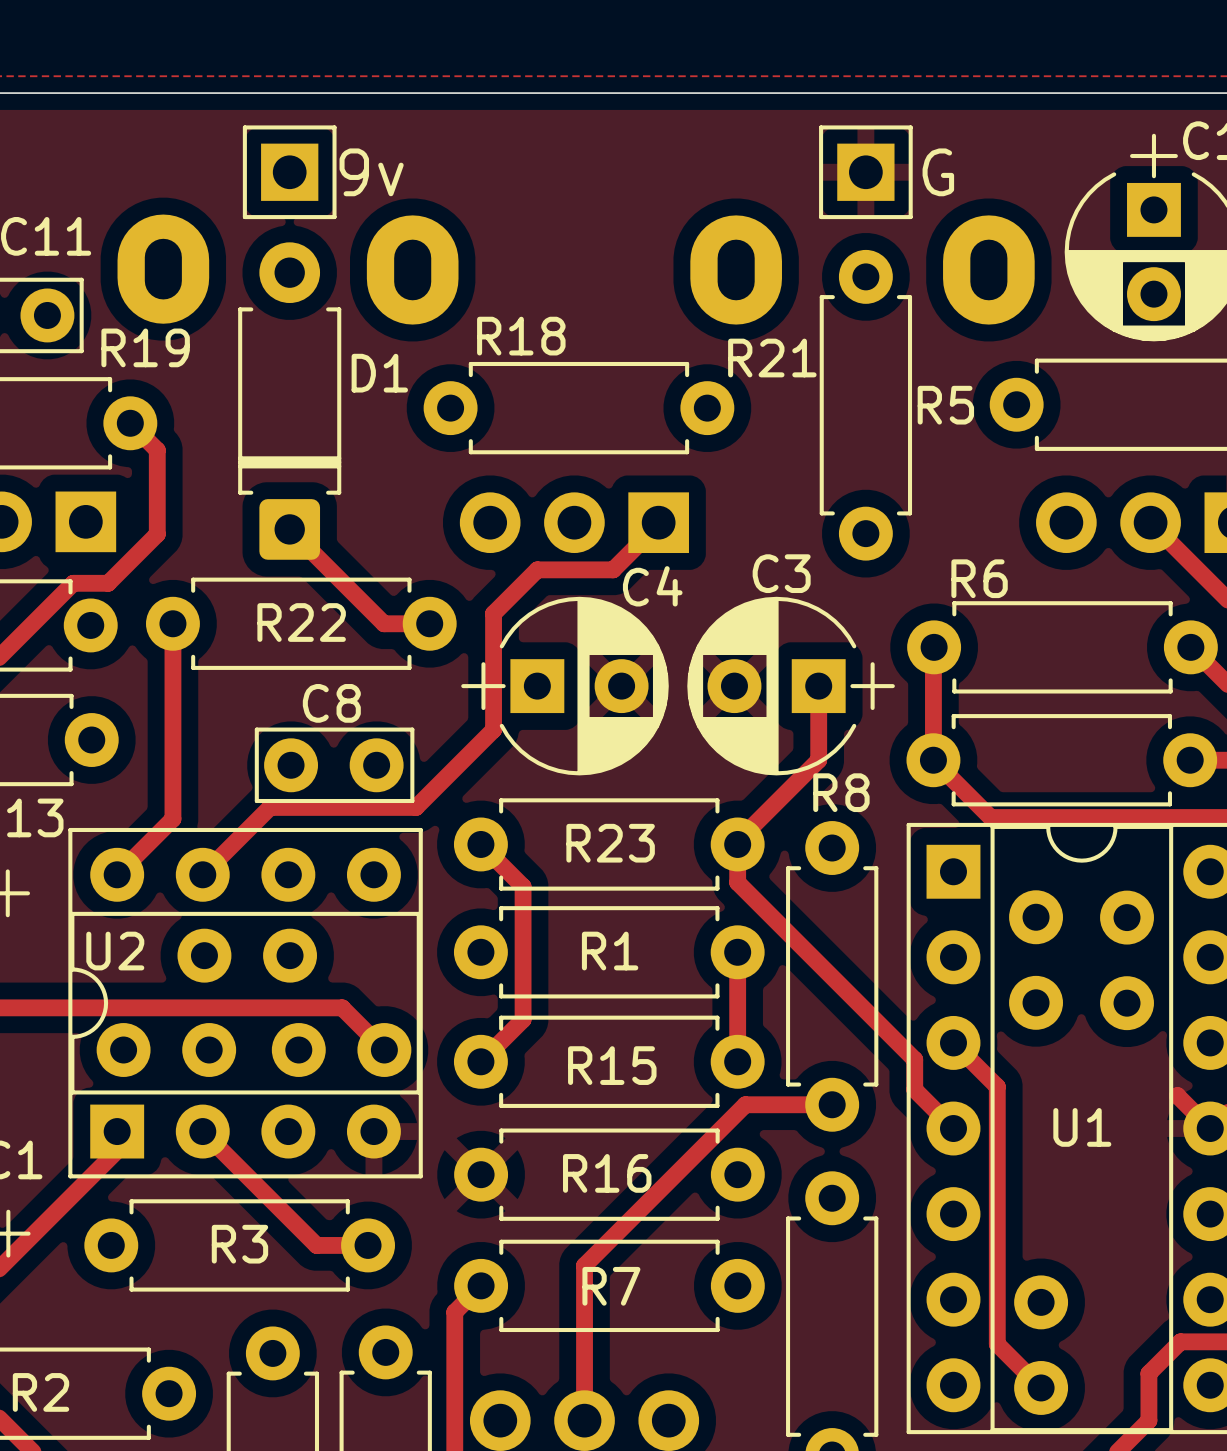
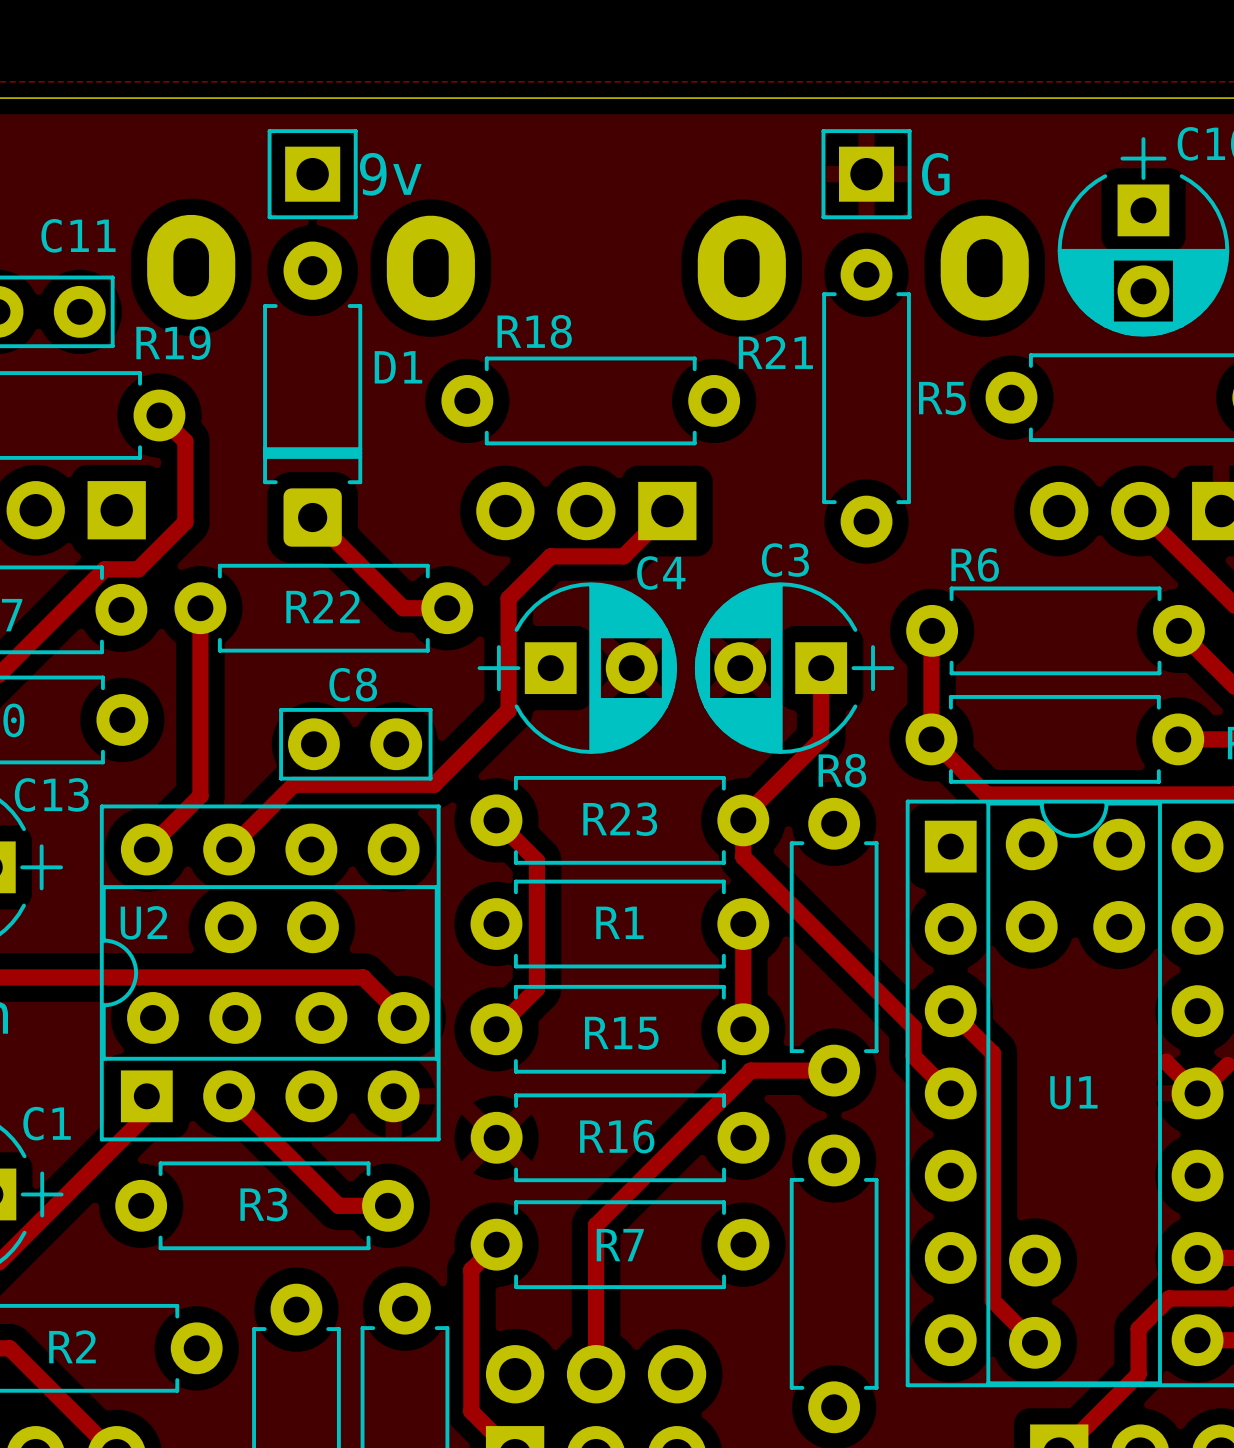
part position: (1036, 960) -> (1031, 885)
part position: (1127, 960) -> (1119, 885)

